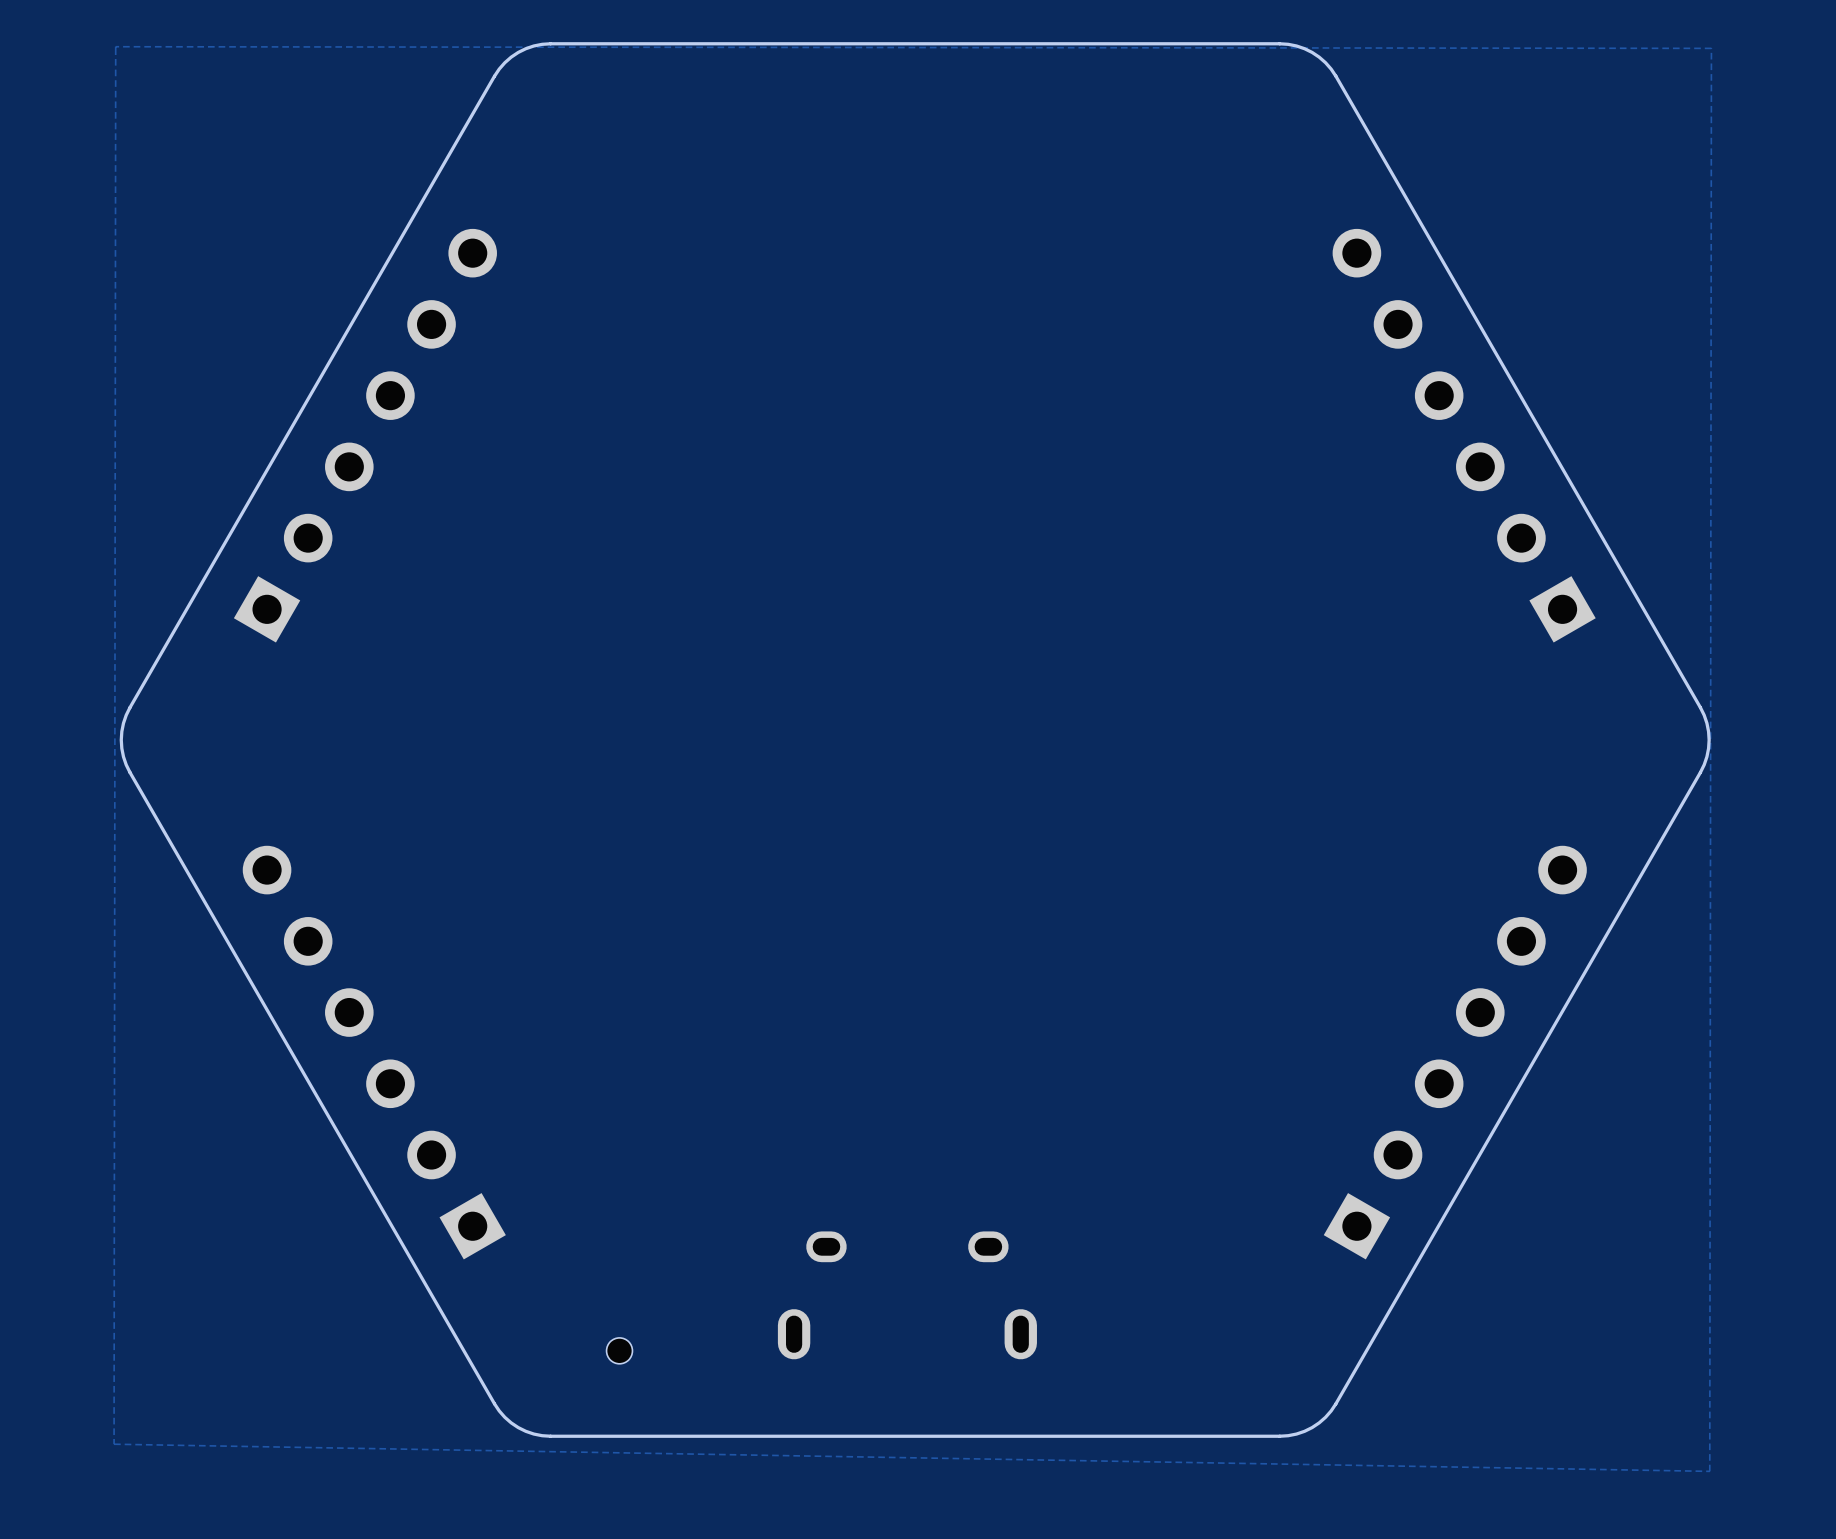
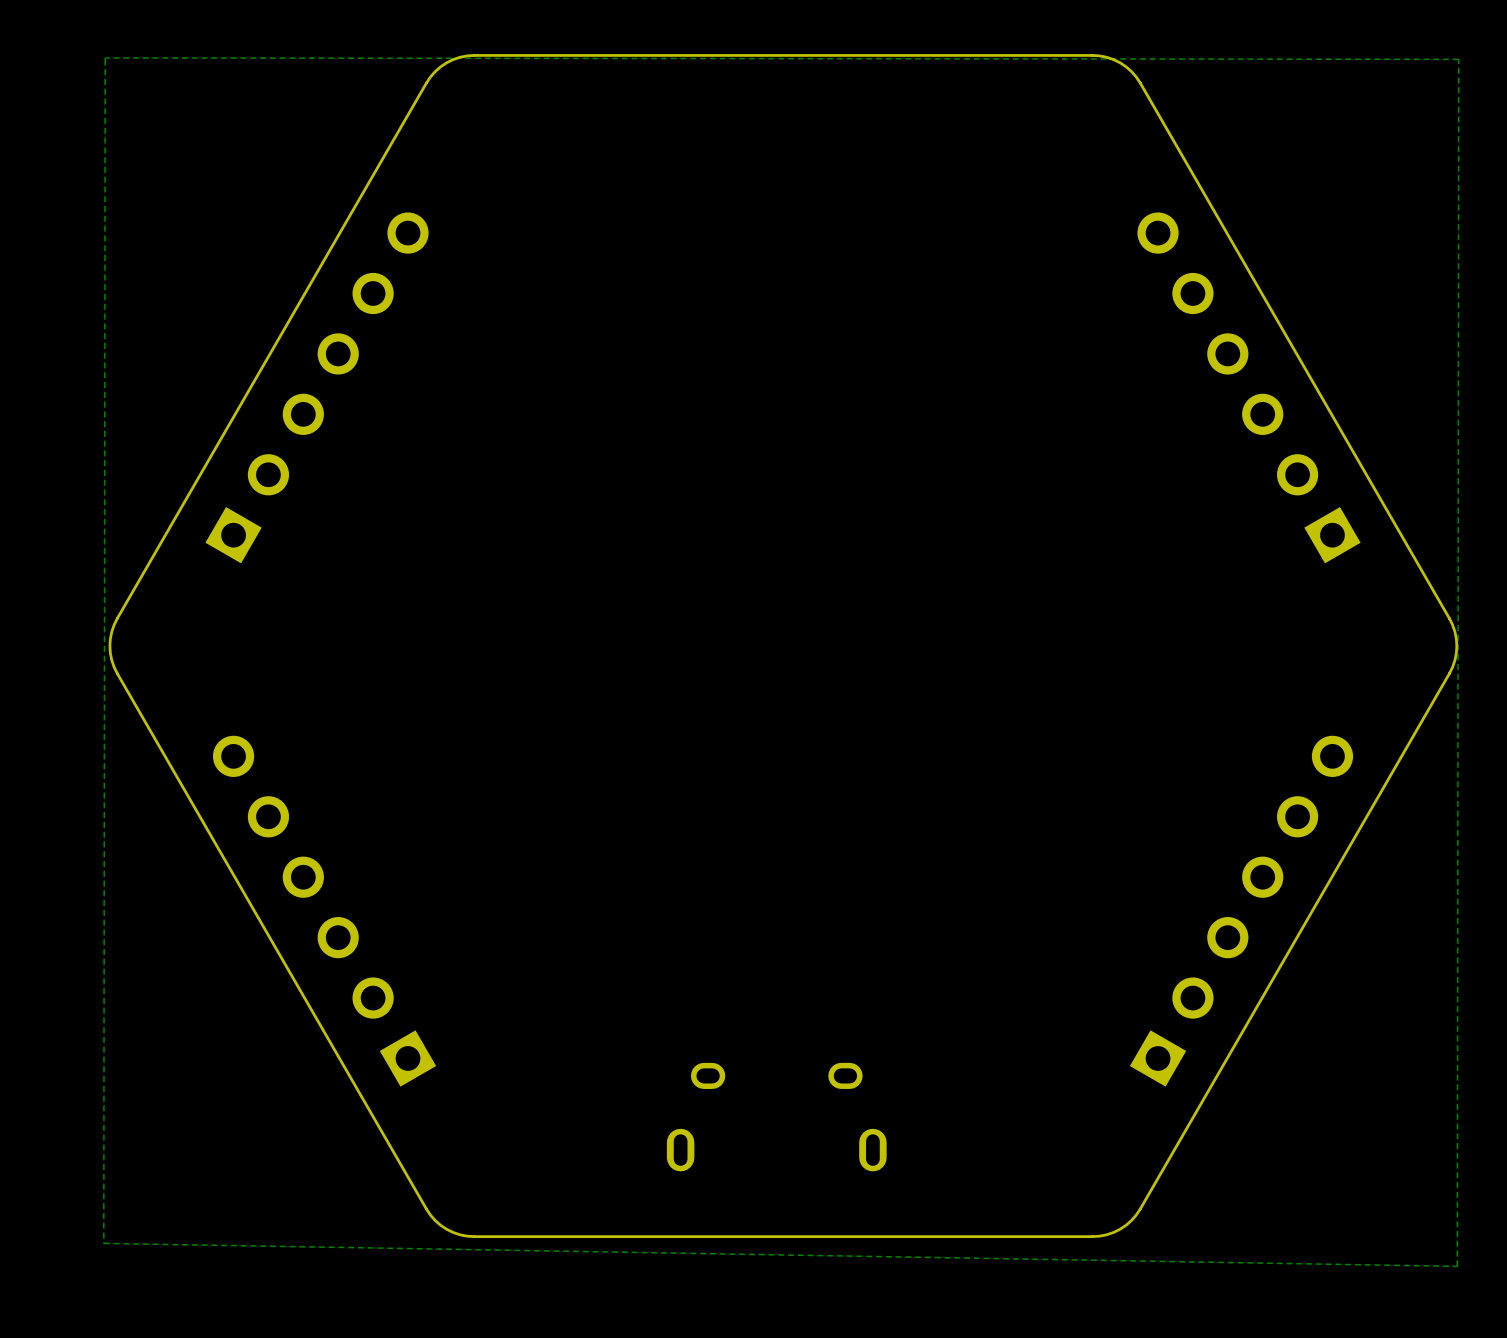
part: (619, 1350) -> none

